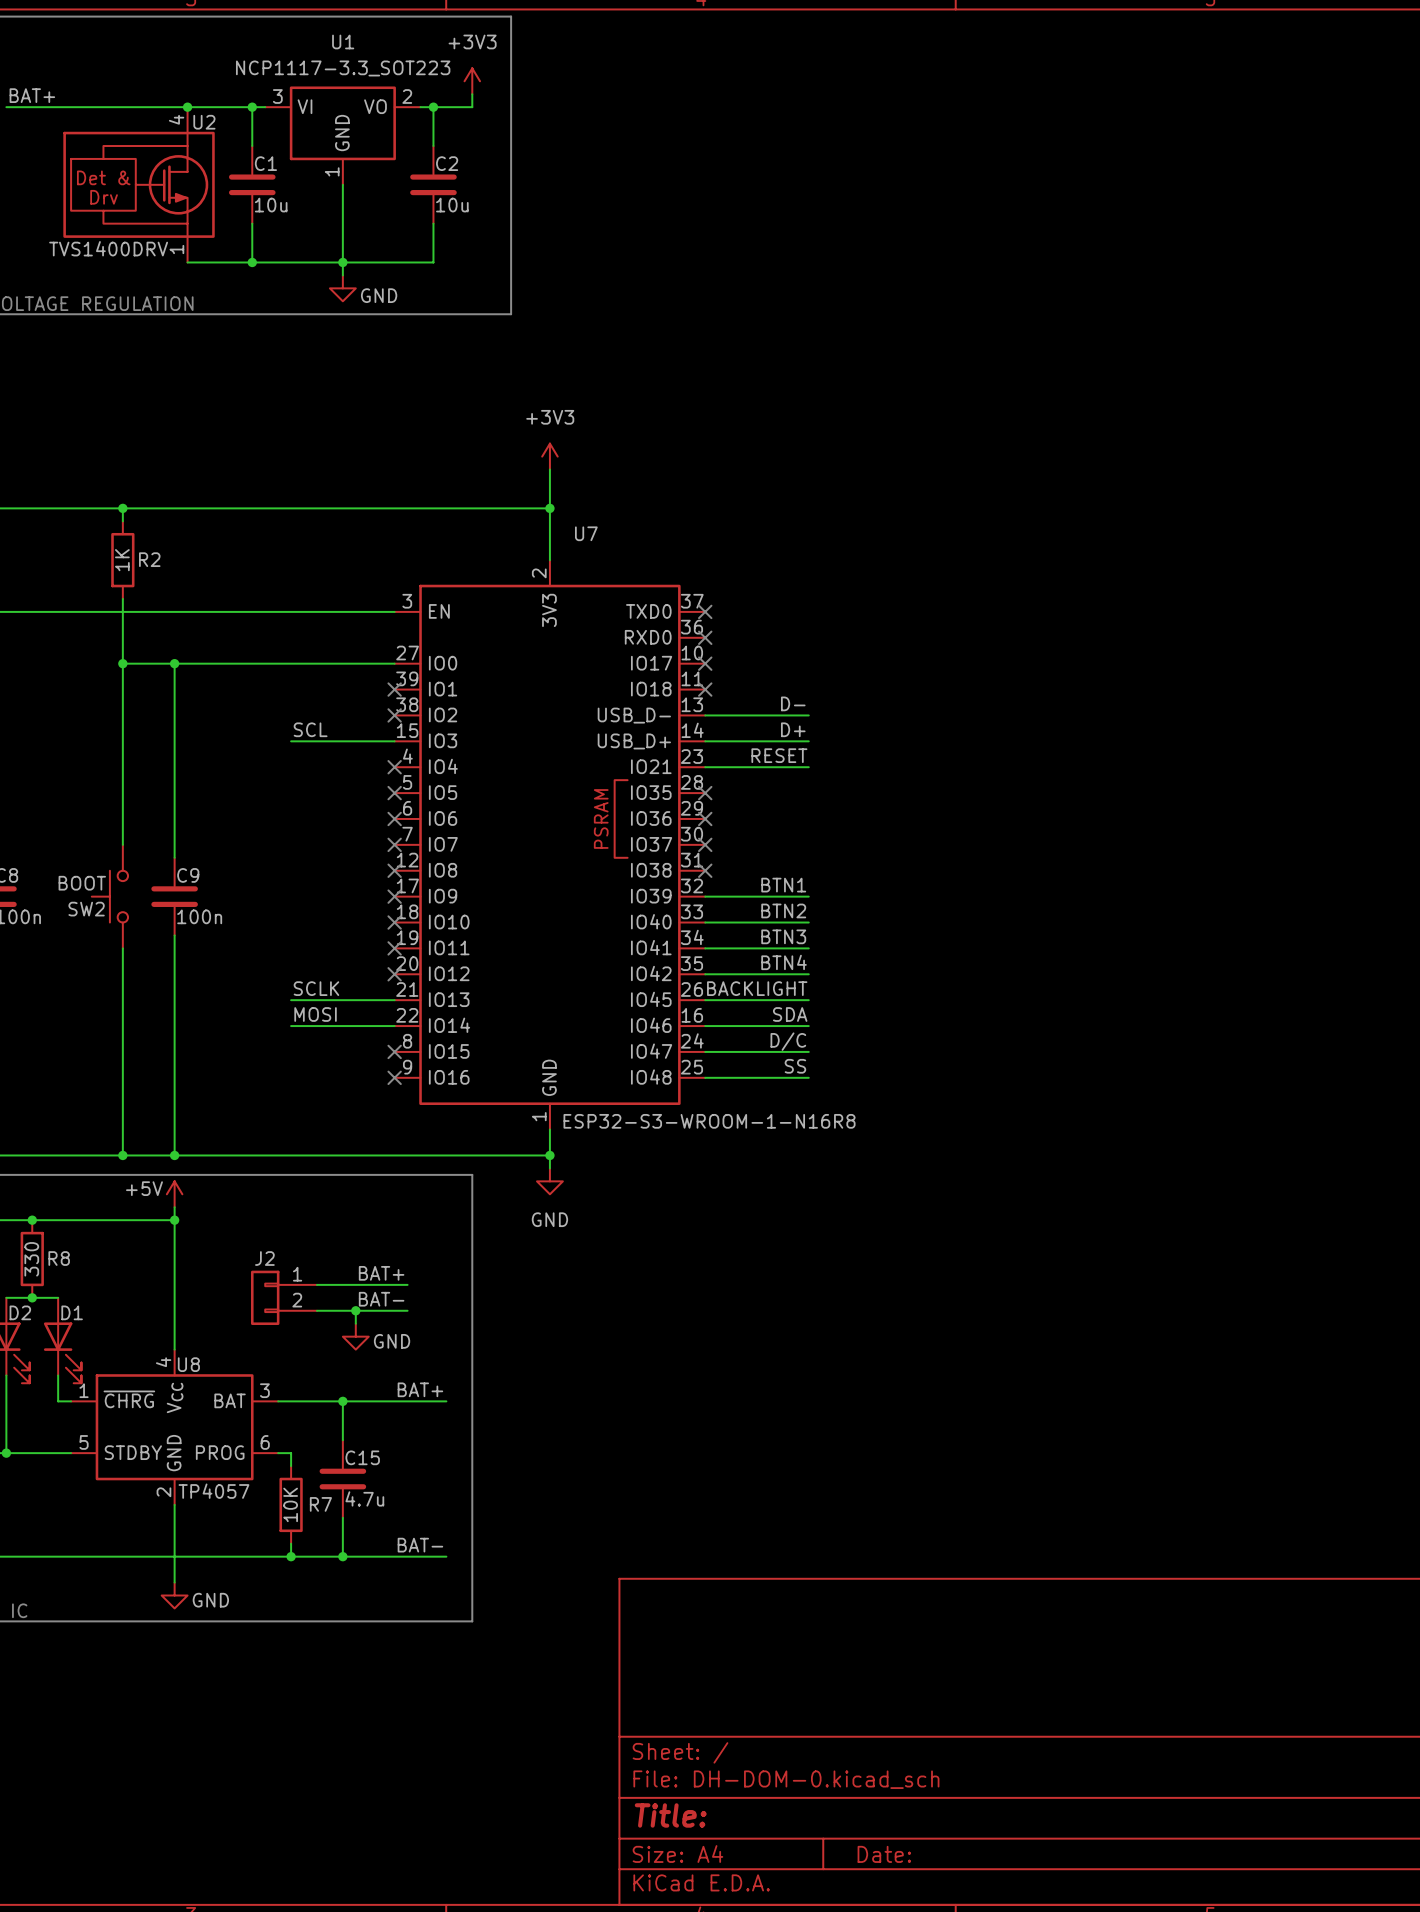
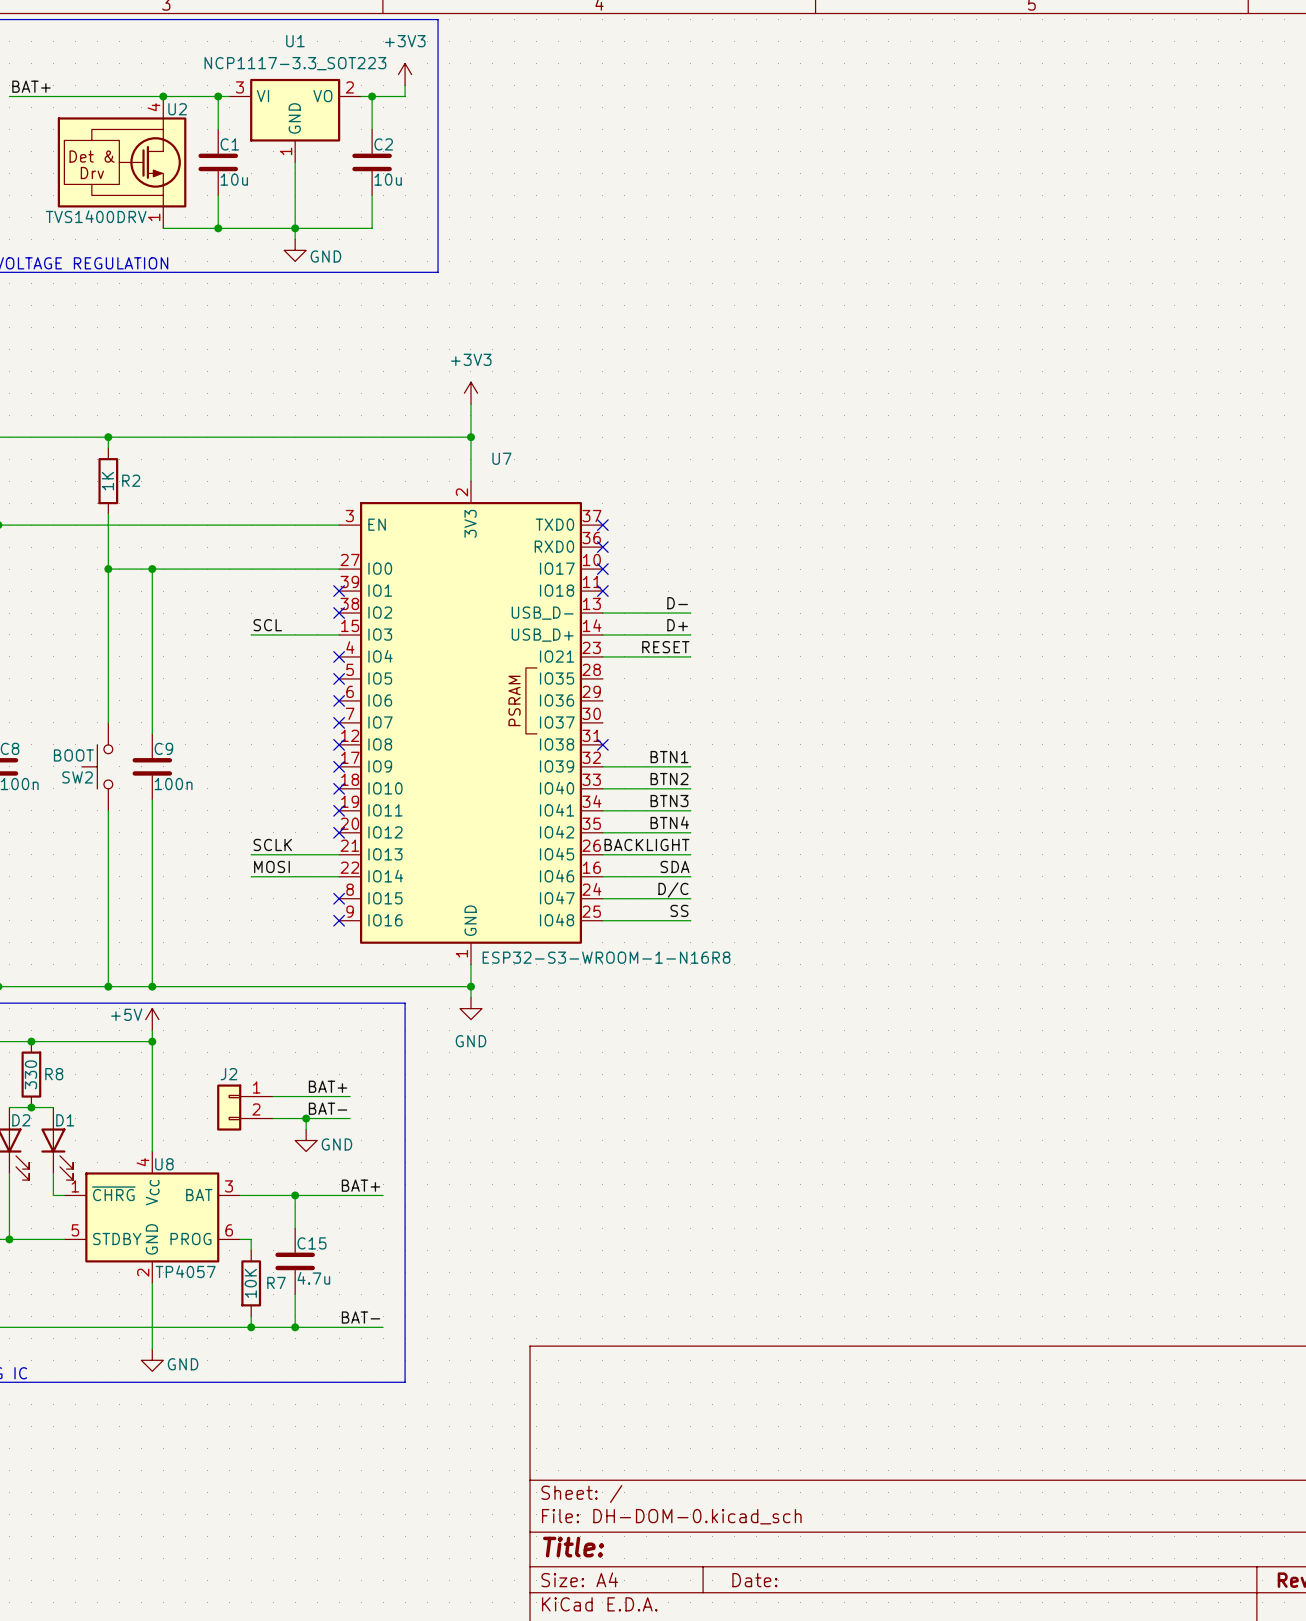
no-connect mark: (705, 793) -> none
no-connect mark: (705, 818) -> none
no-connect mark: (705, 844) -> none

